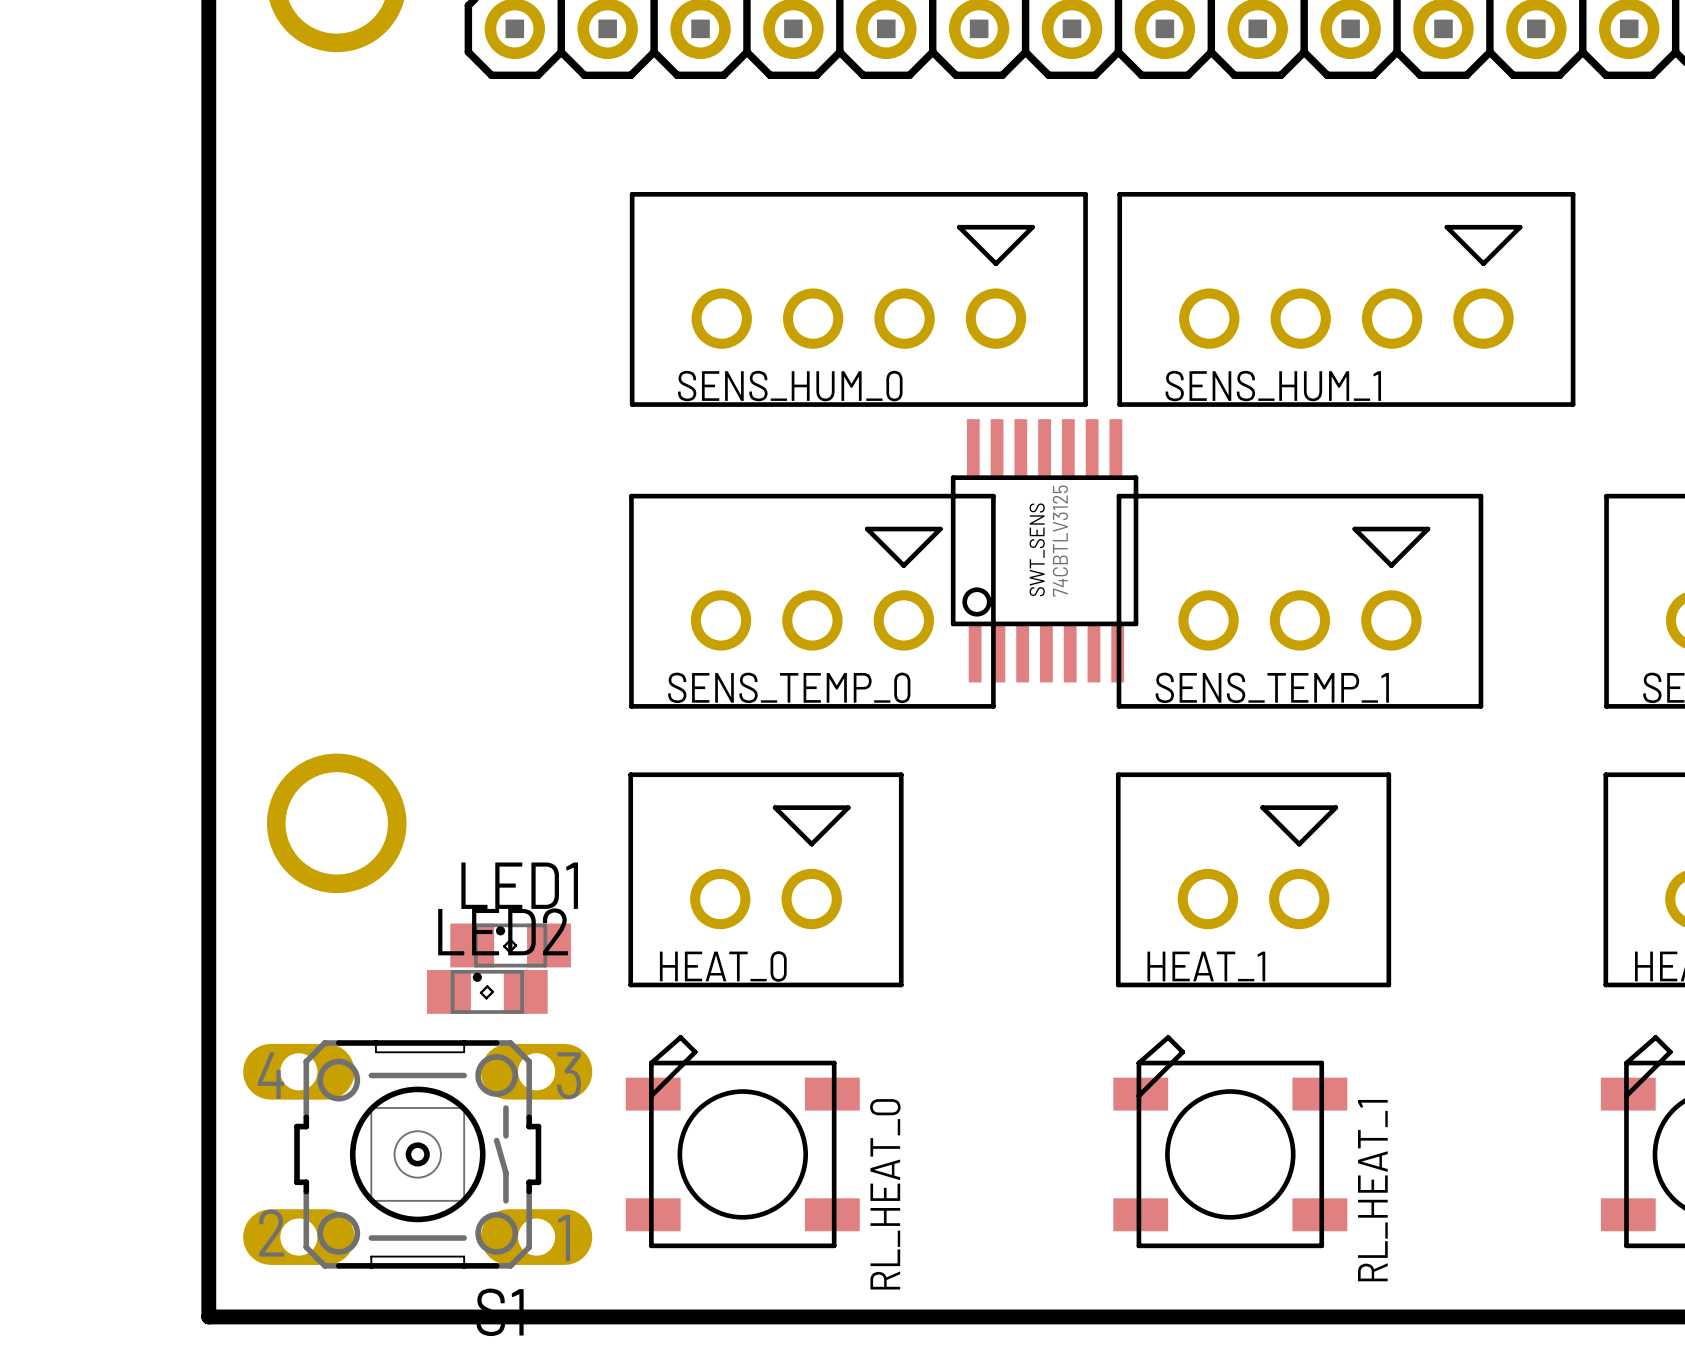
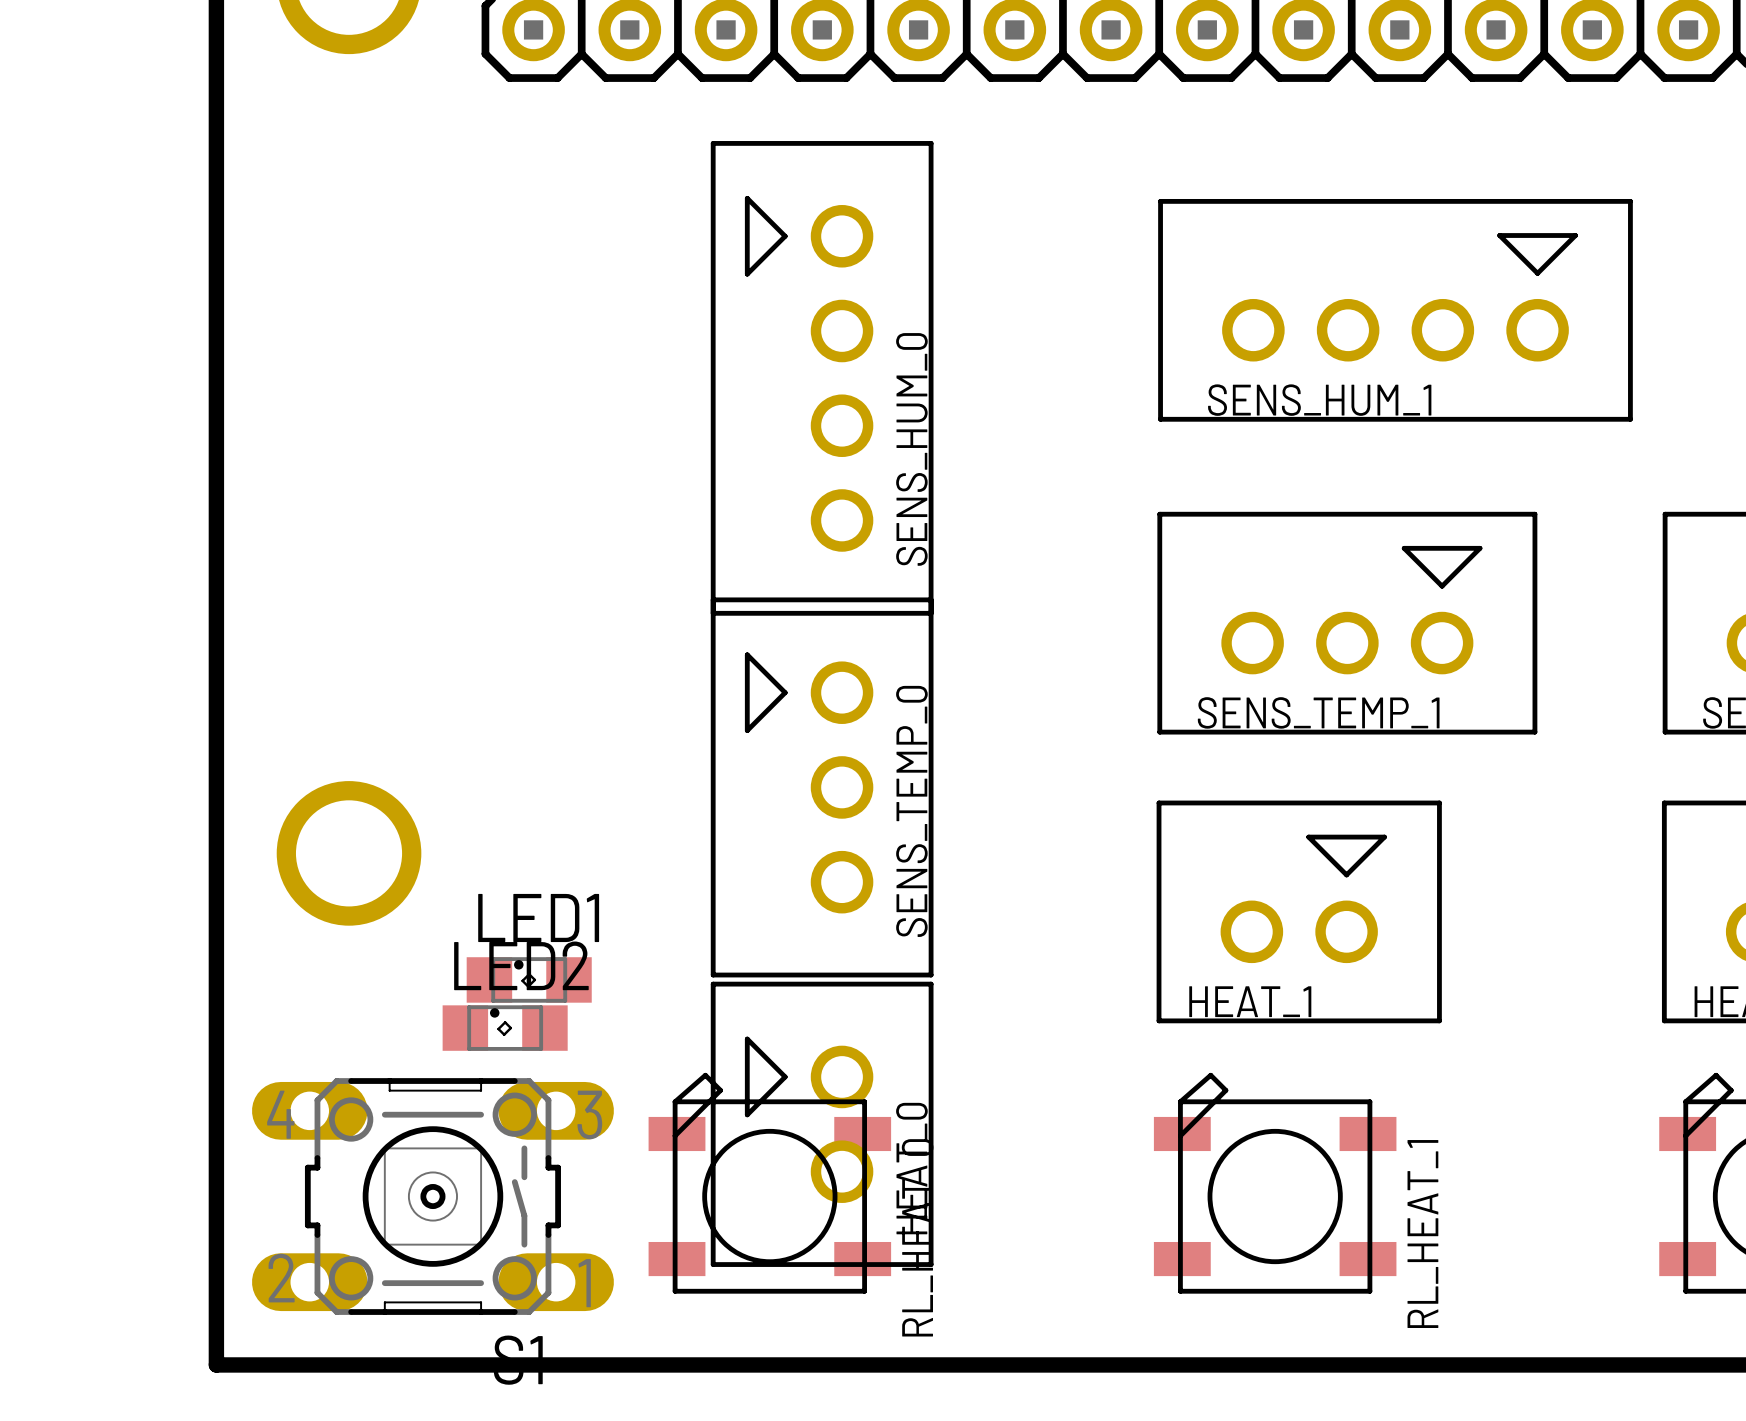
SENS_HUM_0 rotation: 0° (858, 299) -> 90° counterclockwise (822, 378)
SWT_SENS: 74CBTLV3125 (1044, 550) -> none
SENS_TEMP_0 rotation: 0° (812, 601) -> 90° counterclockwise (822, 787)
HEAT_0 rotation: 0° (765, 879) -> 90° counterclockwise (822, 1124)
HEAT_0 position: (765, 879) -> (822, 1124)

